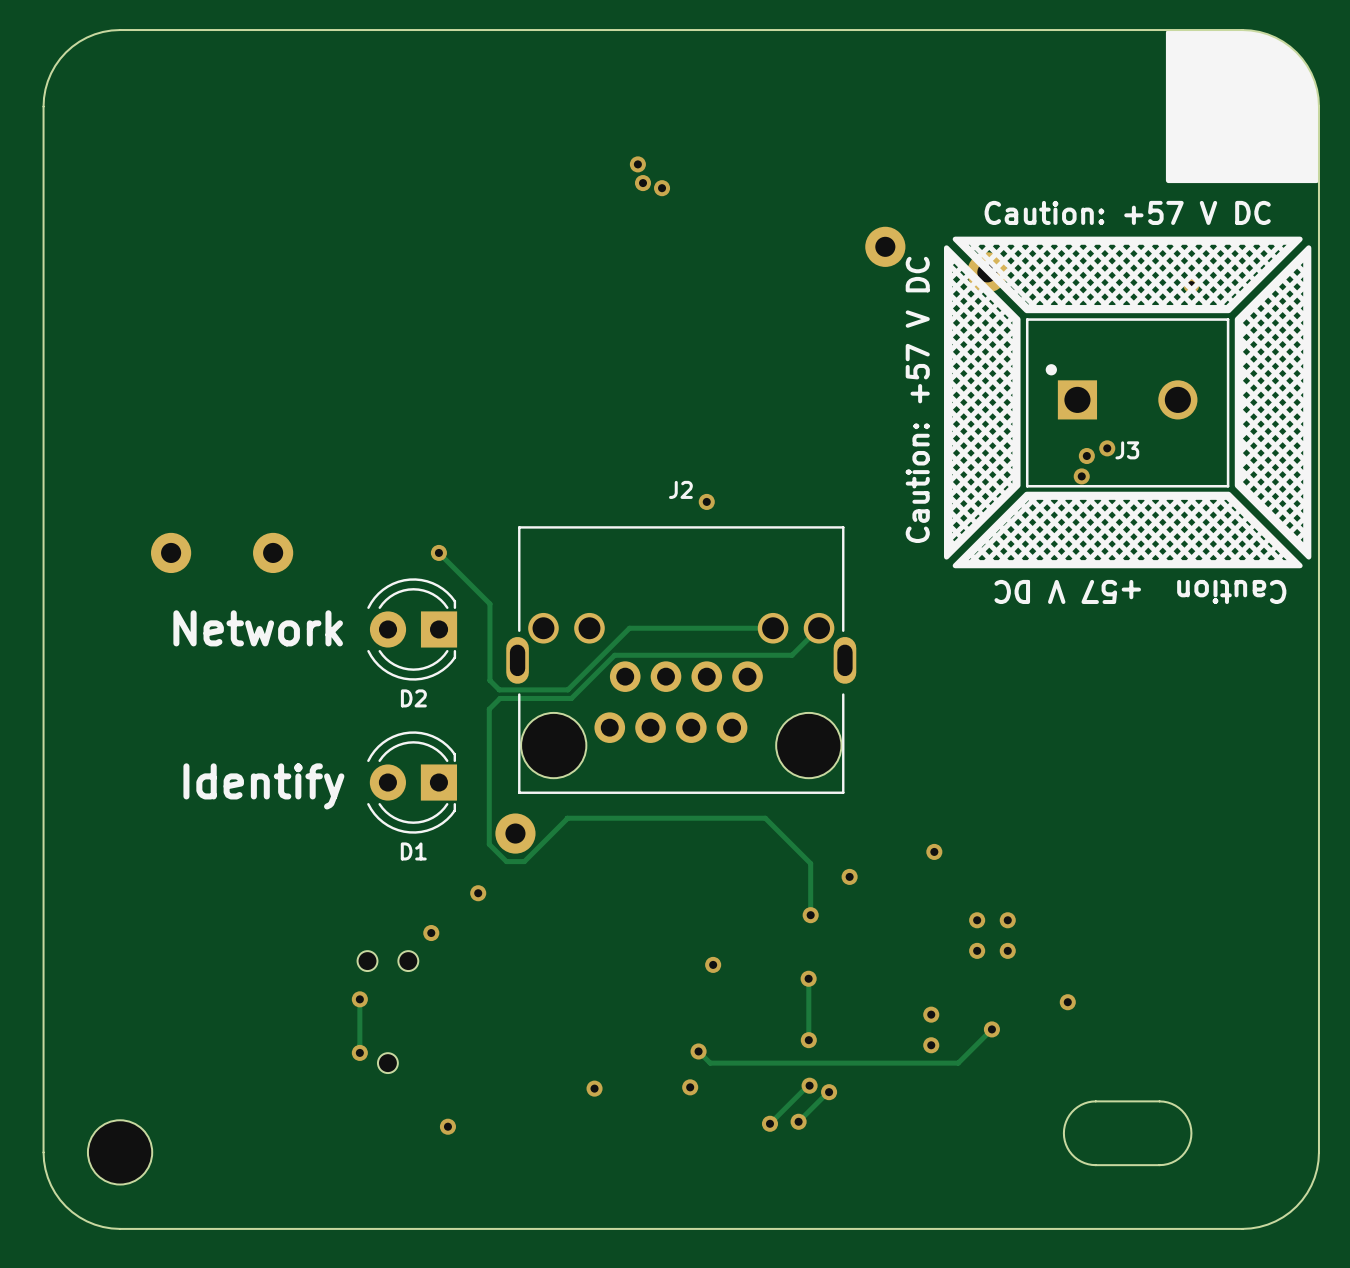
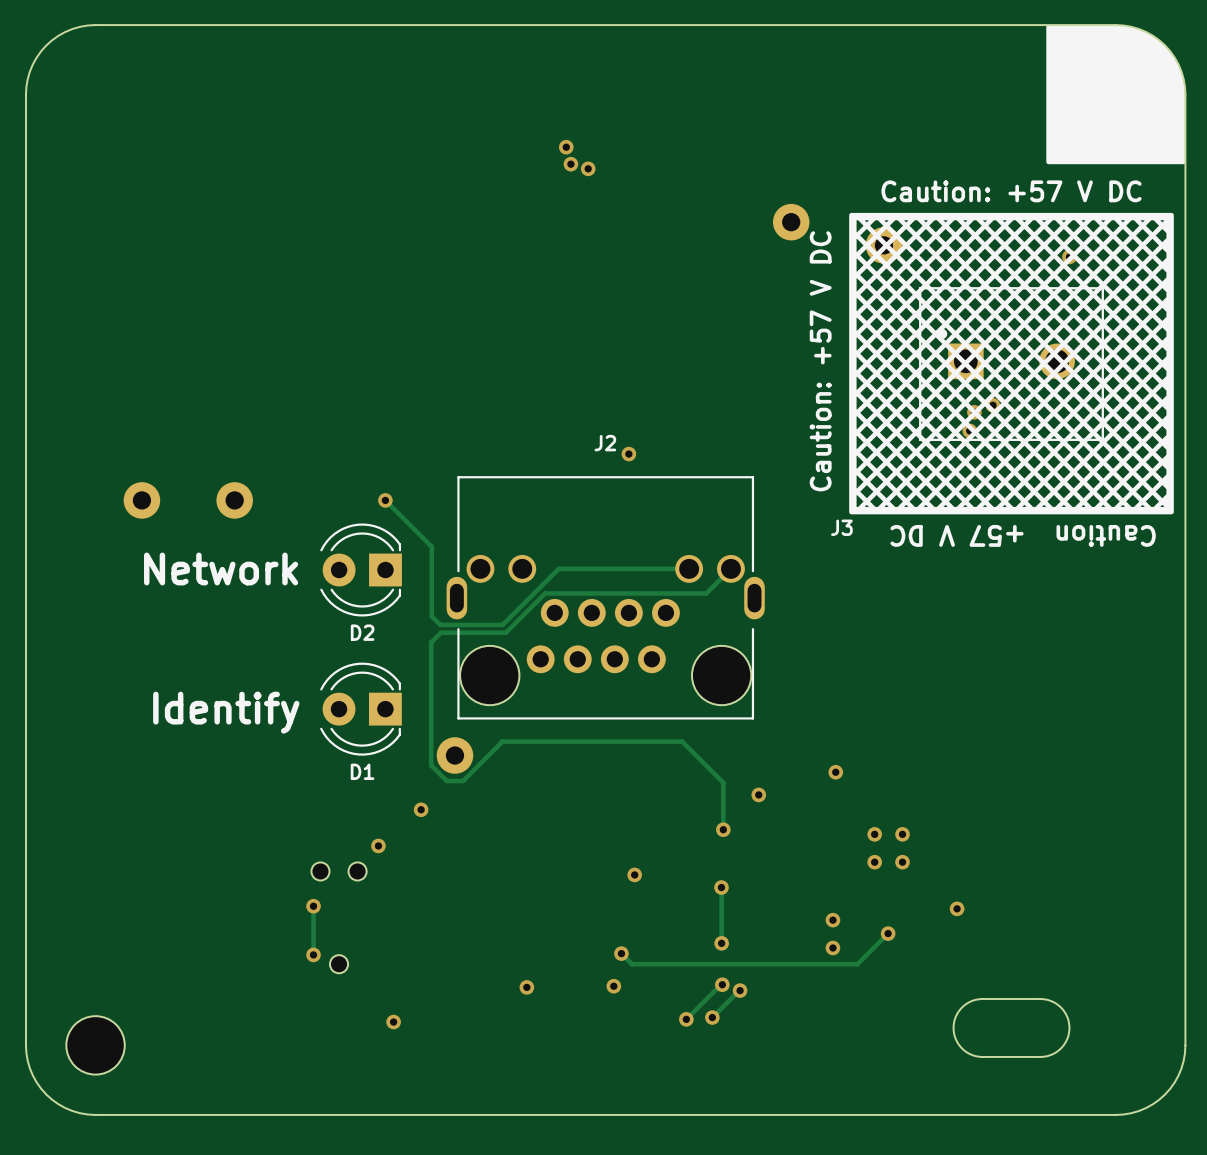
drawing: [944, 236, 1312, 569] -> none
drawing: none -> [849, 212, 1174, 515]
J3 name position: J3 (1127, 450) -> J3 (841, 527)

